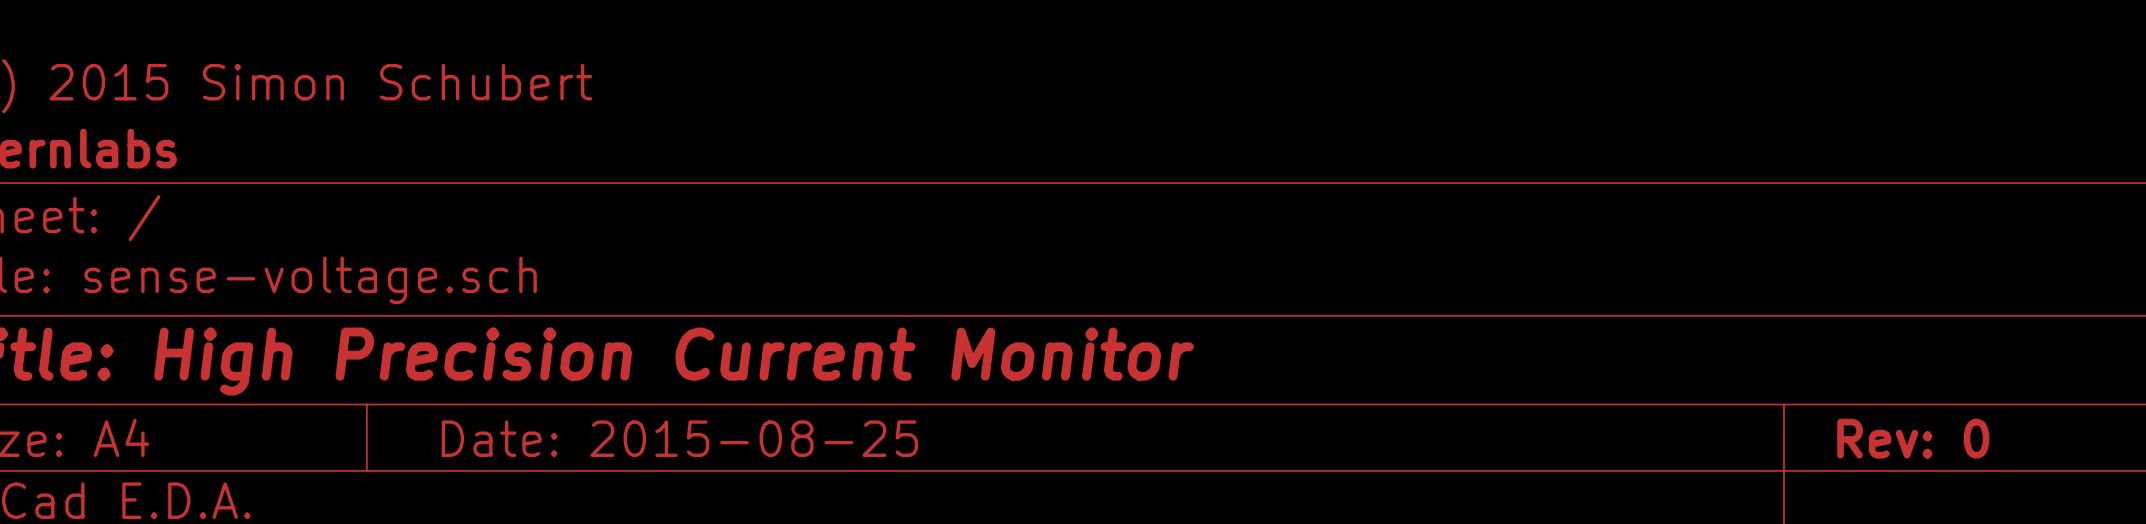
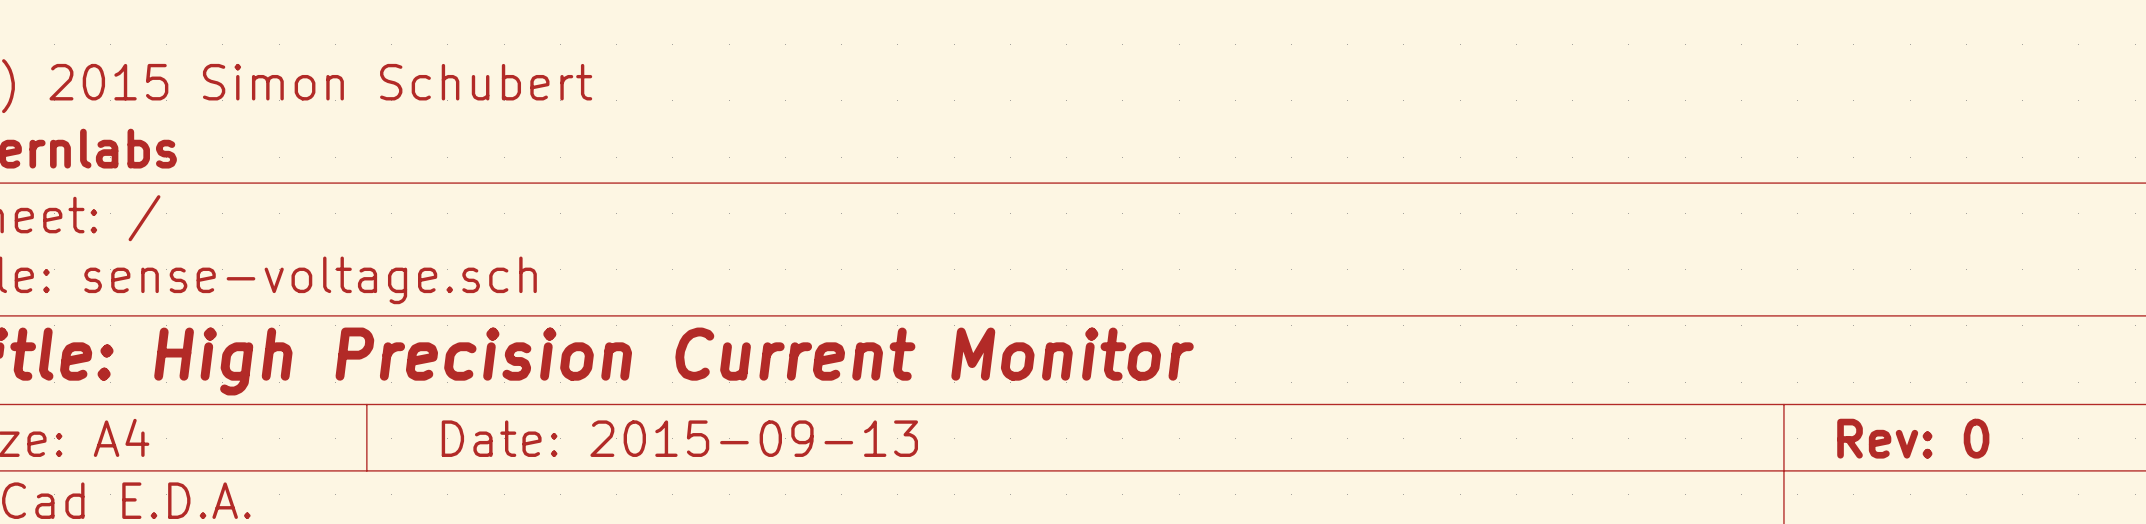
title block: Date: 2015-08-25 (679, 438) -> Date: 2015-09-13 (679, 438)

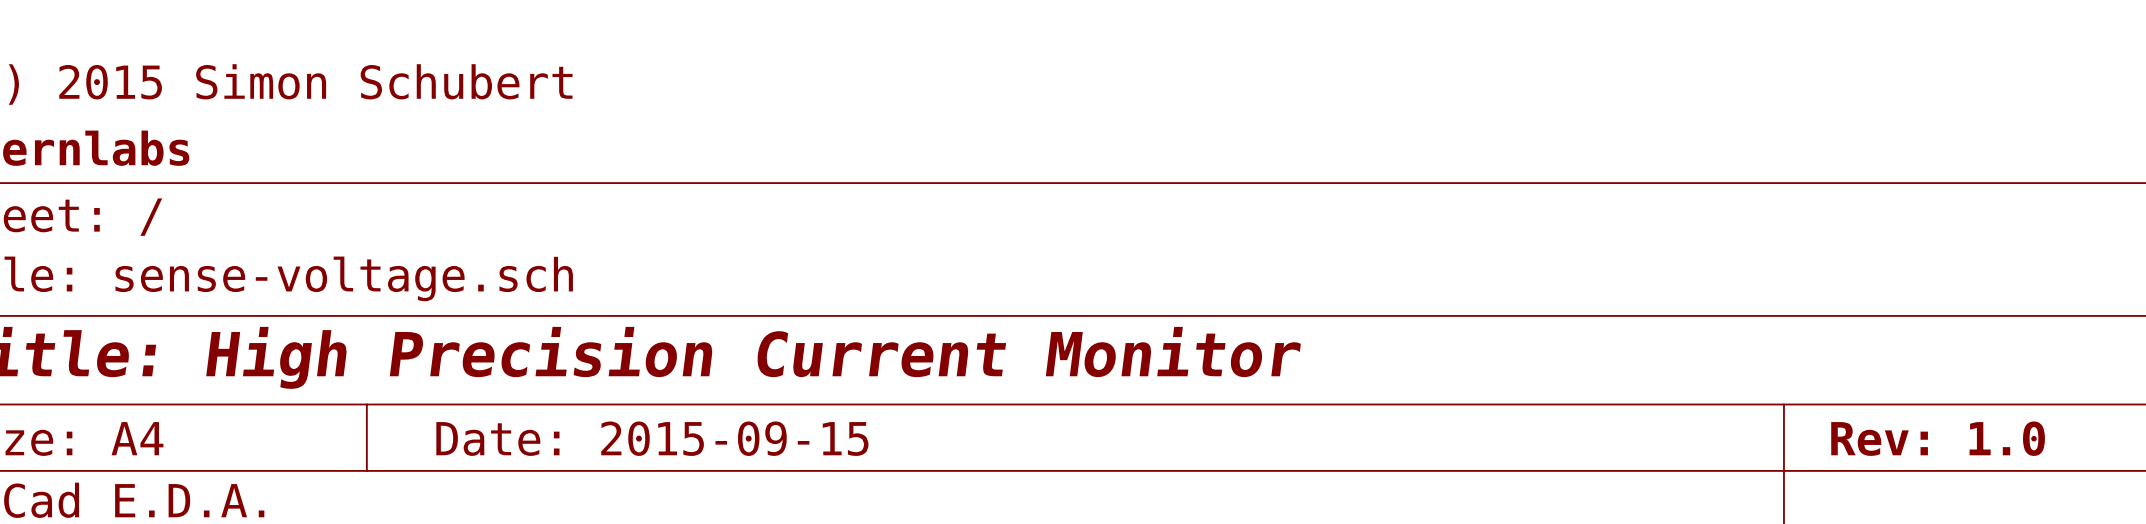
title block: Date: 2015-09-13 (679, 438) -> Date: 2015-09-15 (652, 438)
title block: Rev: 0 (1913, 438) -> Rev: 1.0 (1938, 438)

